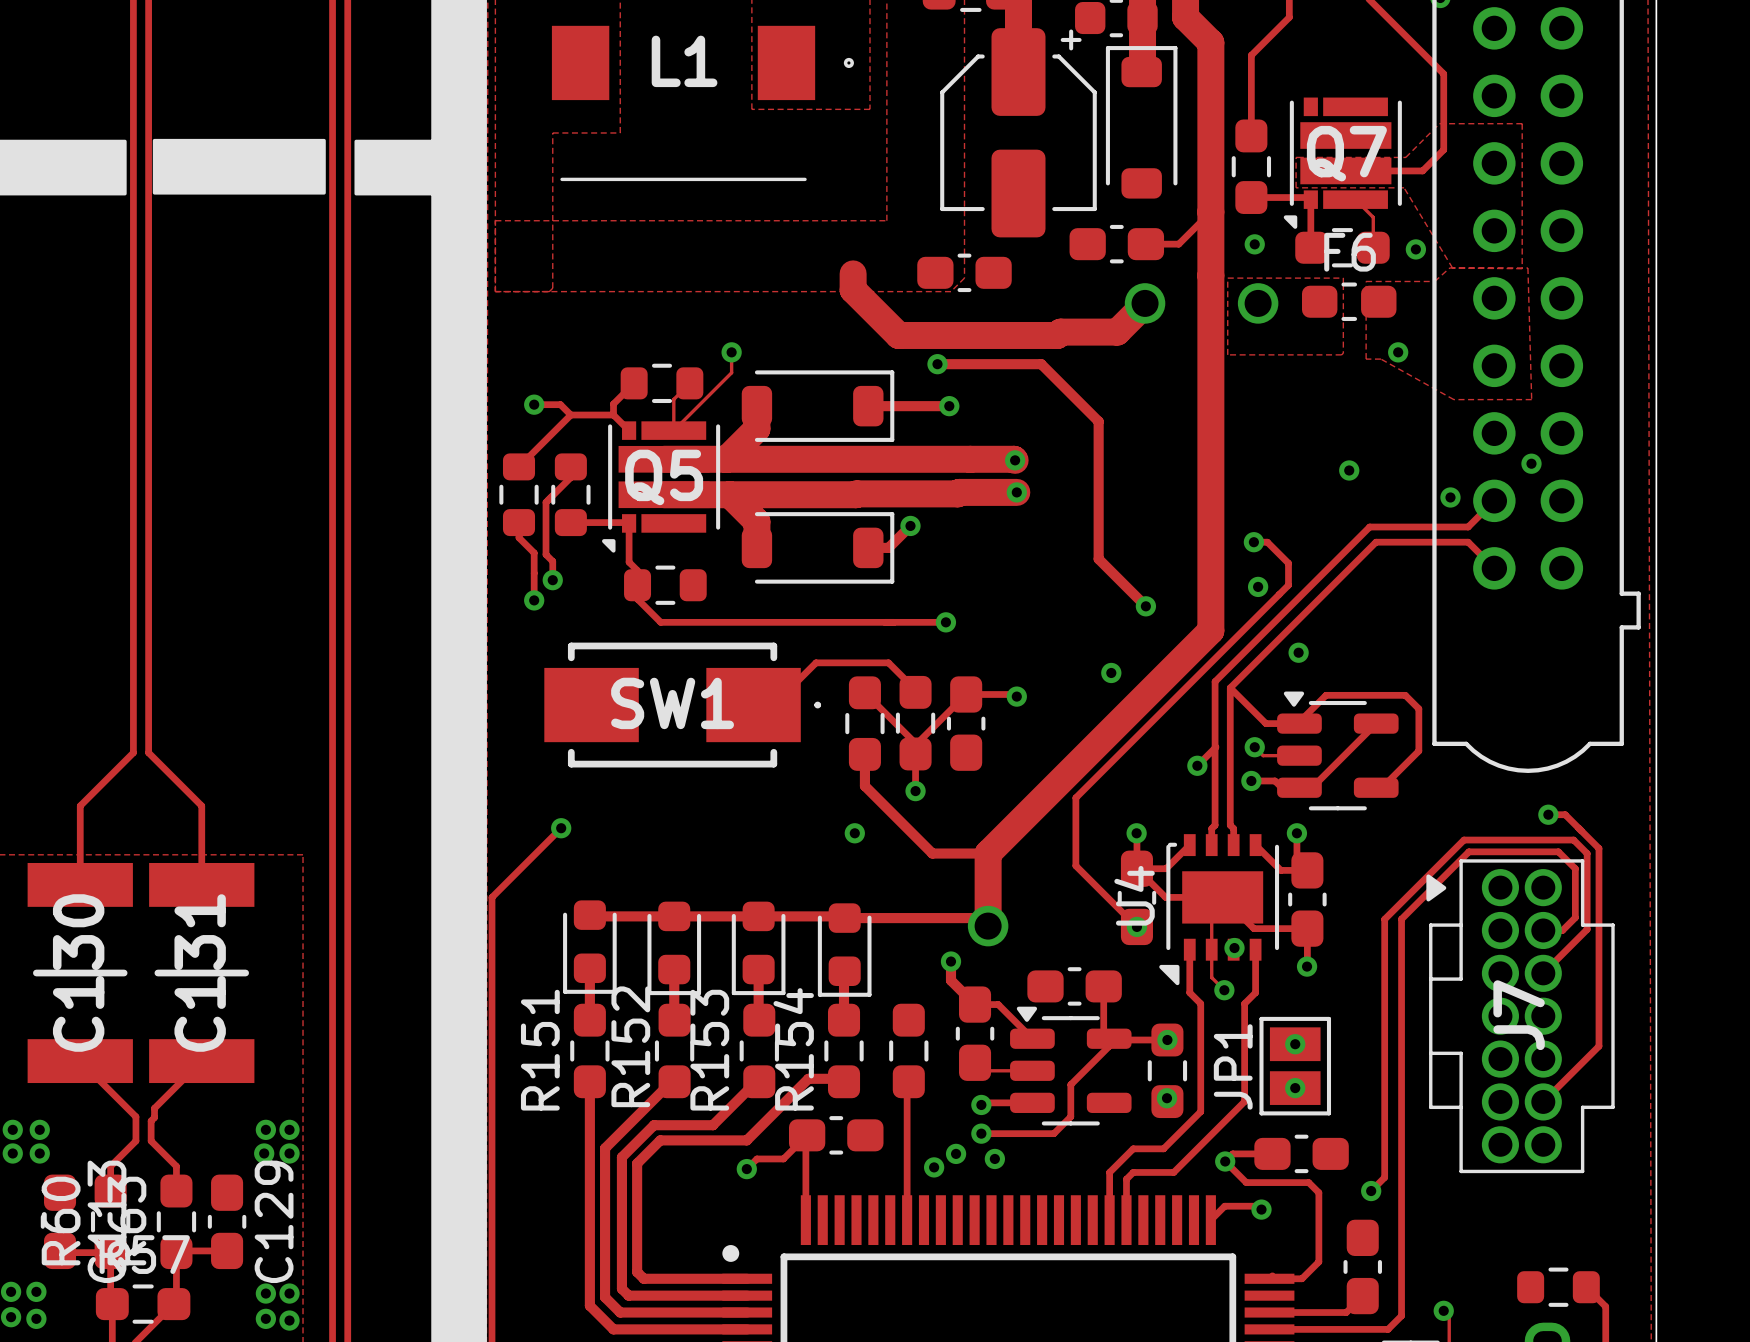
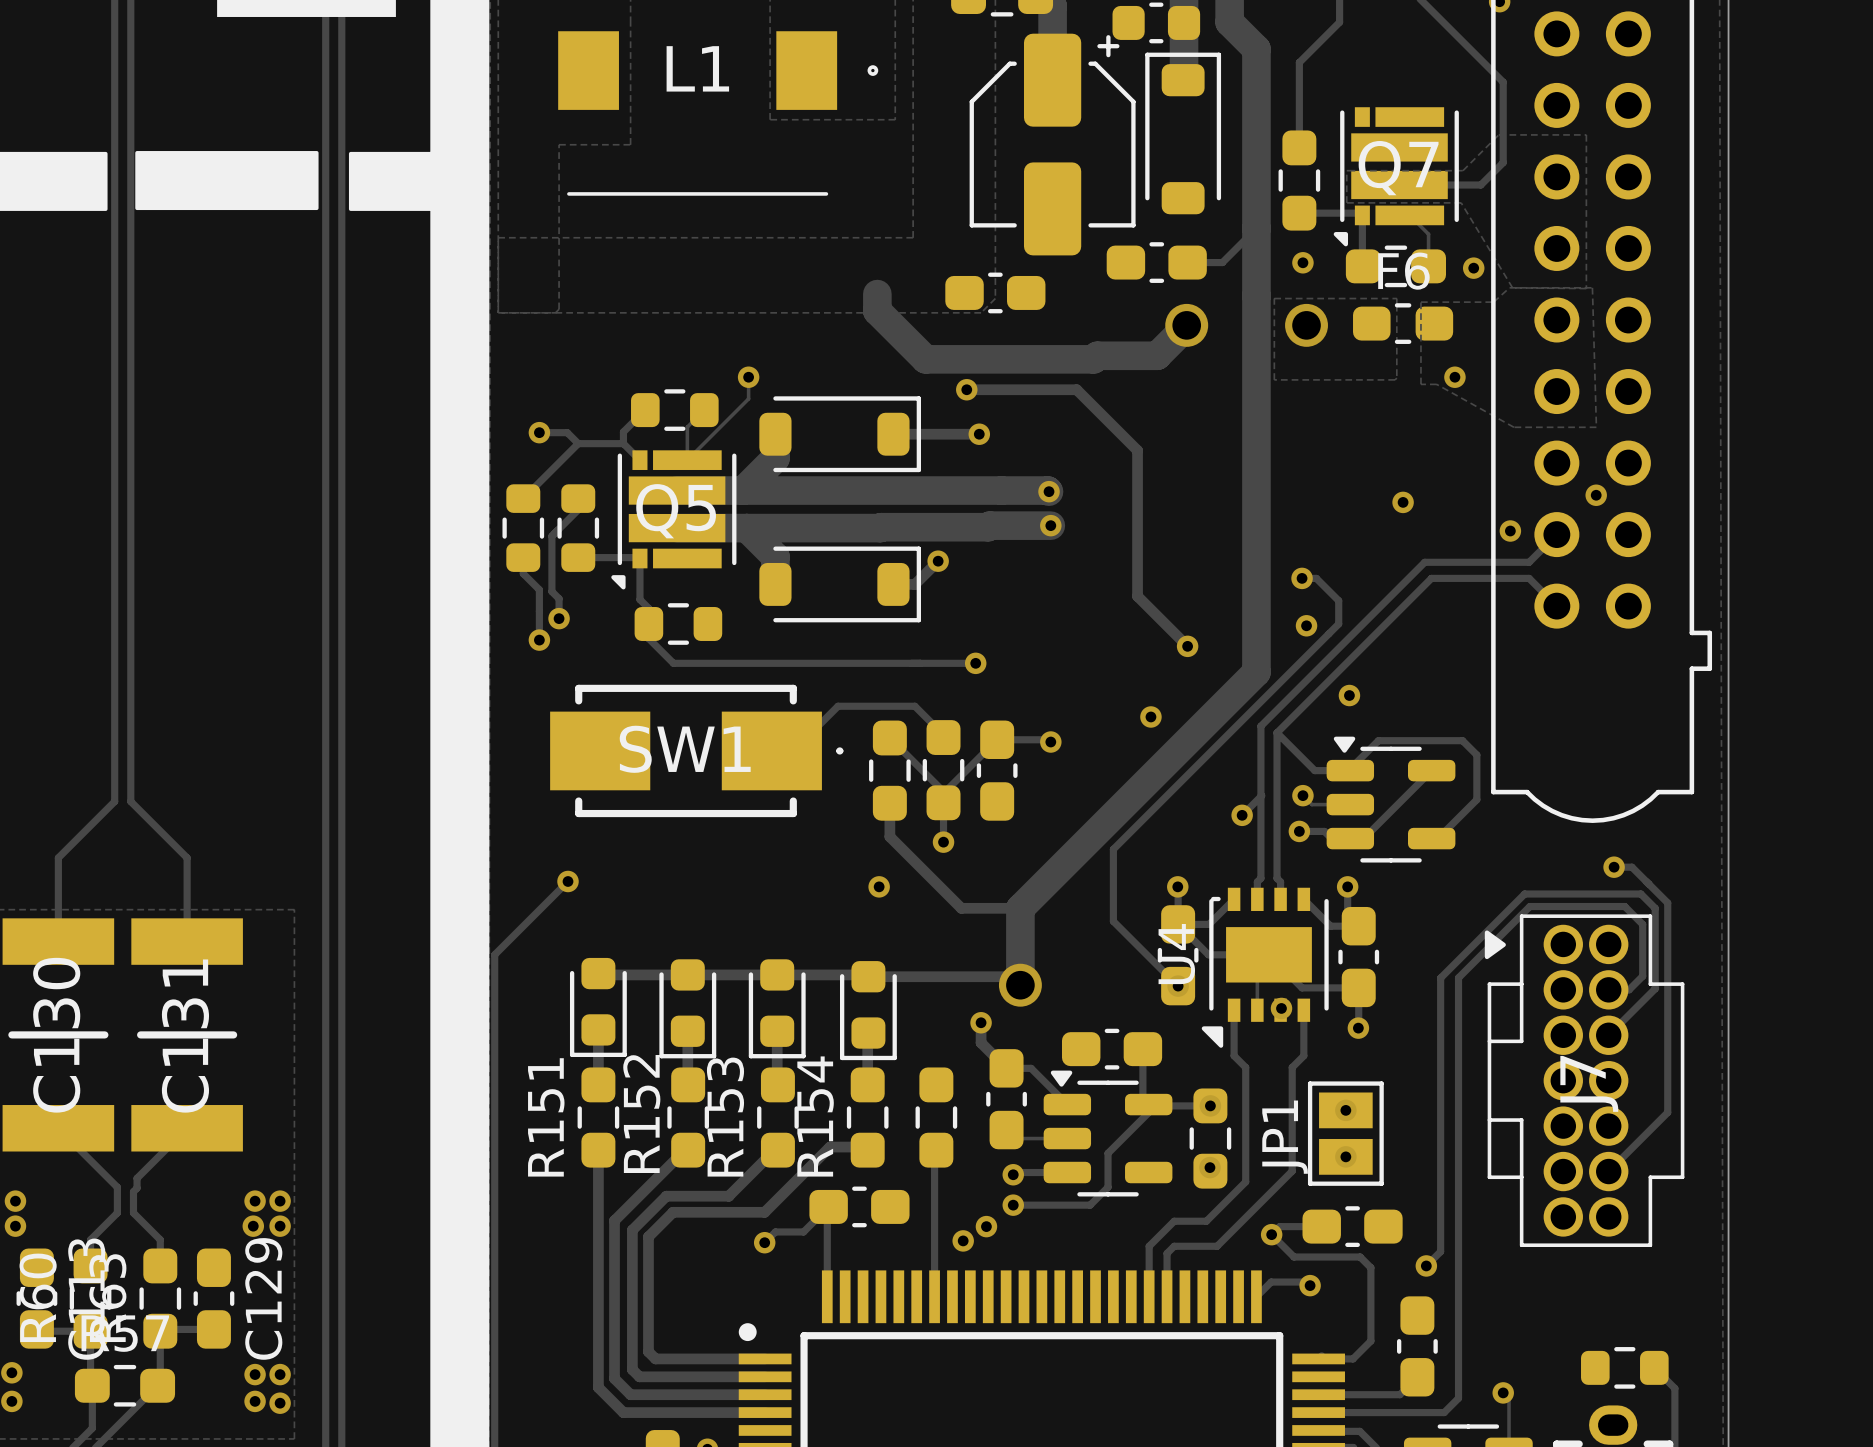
track: (1211, 949) (1211, 977) (1224, 990) -> none
via: (1224, 990) -> none
via: (994, 1158) -> none

